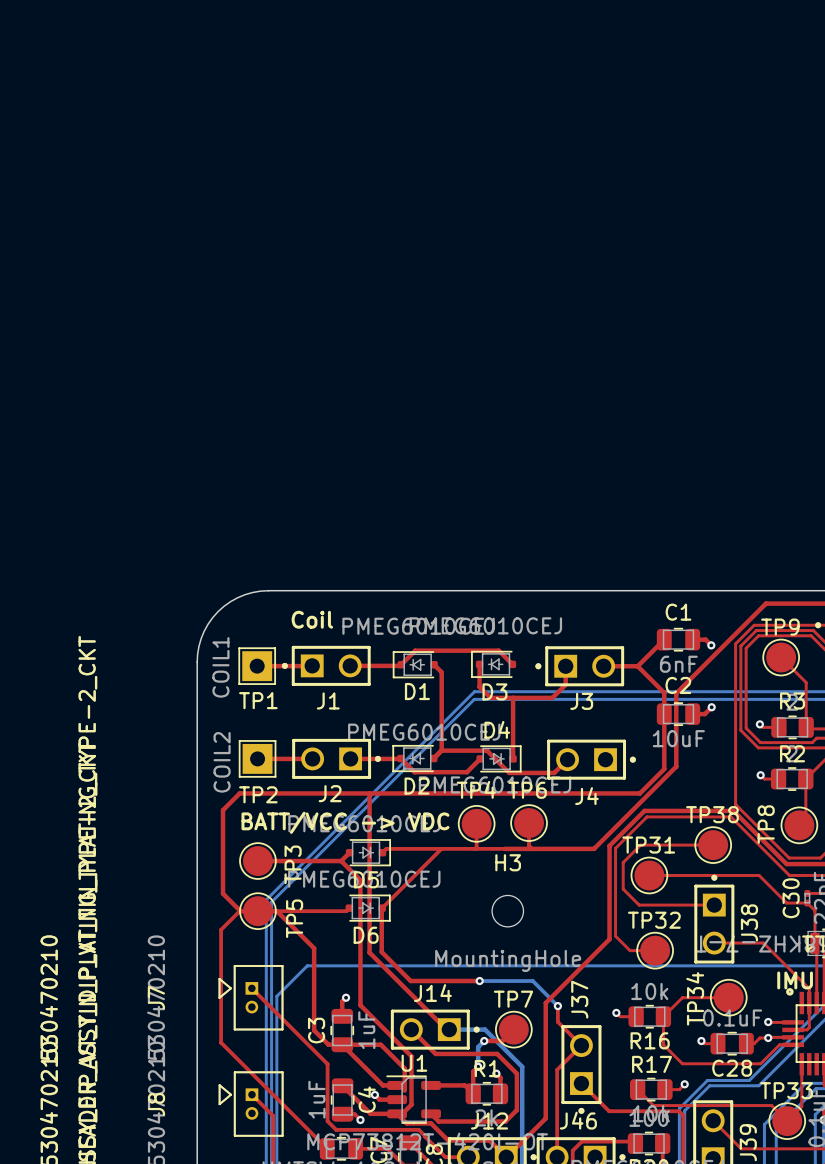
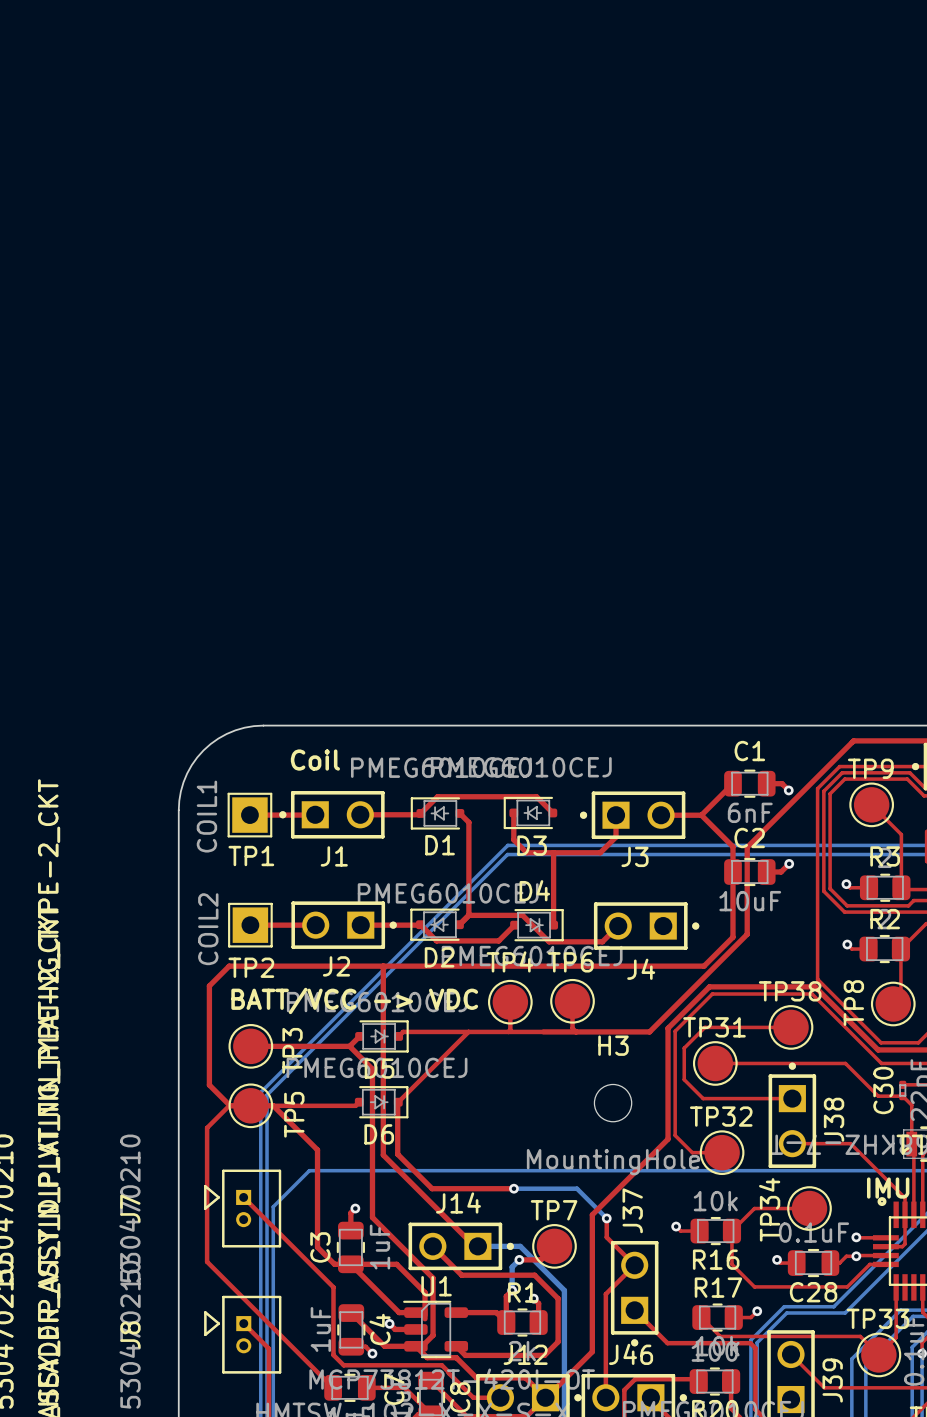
H3 position: (507, 911) -> (613, 1103)

